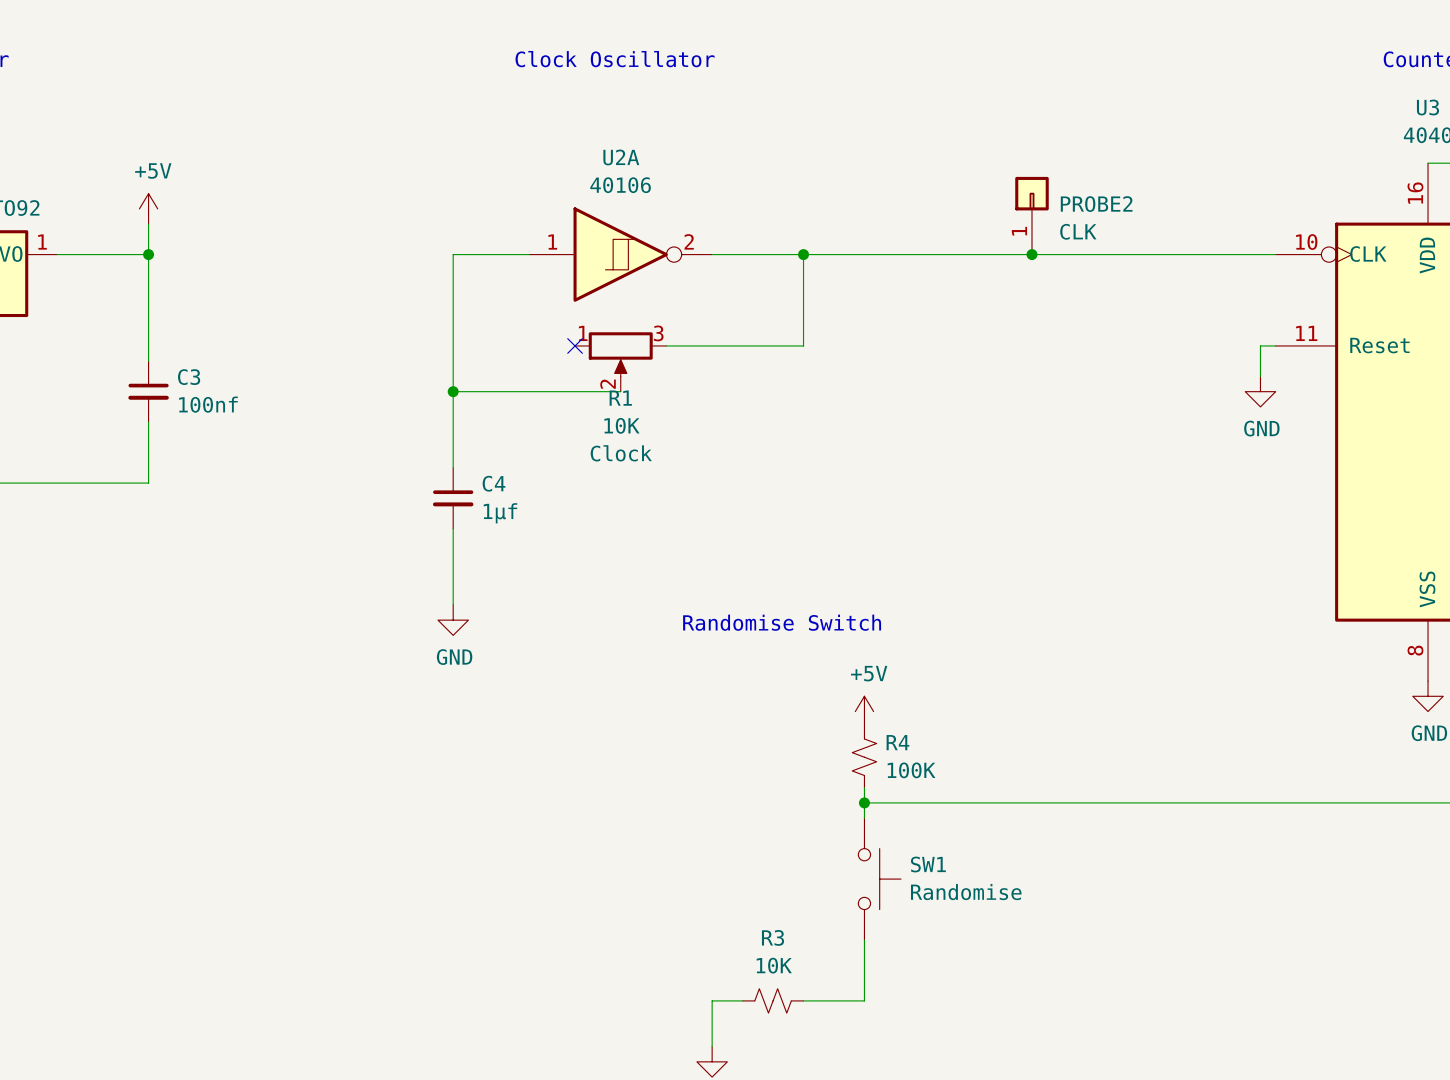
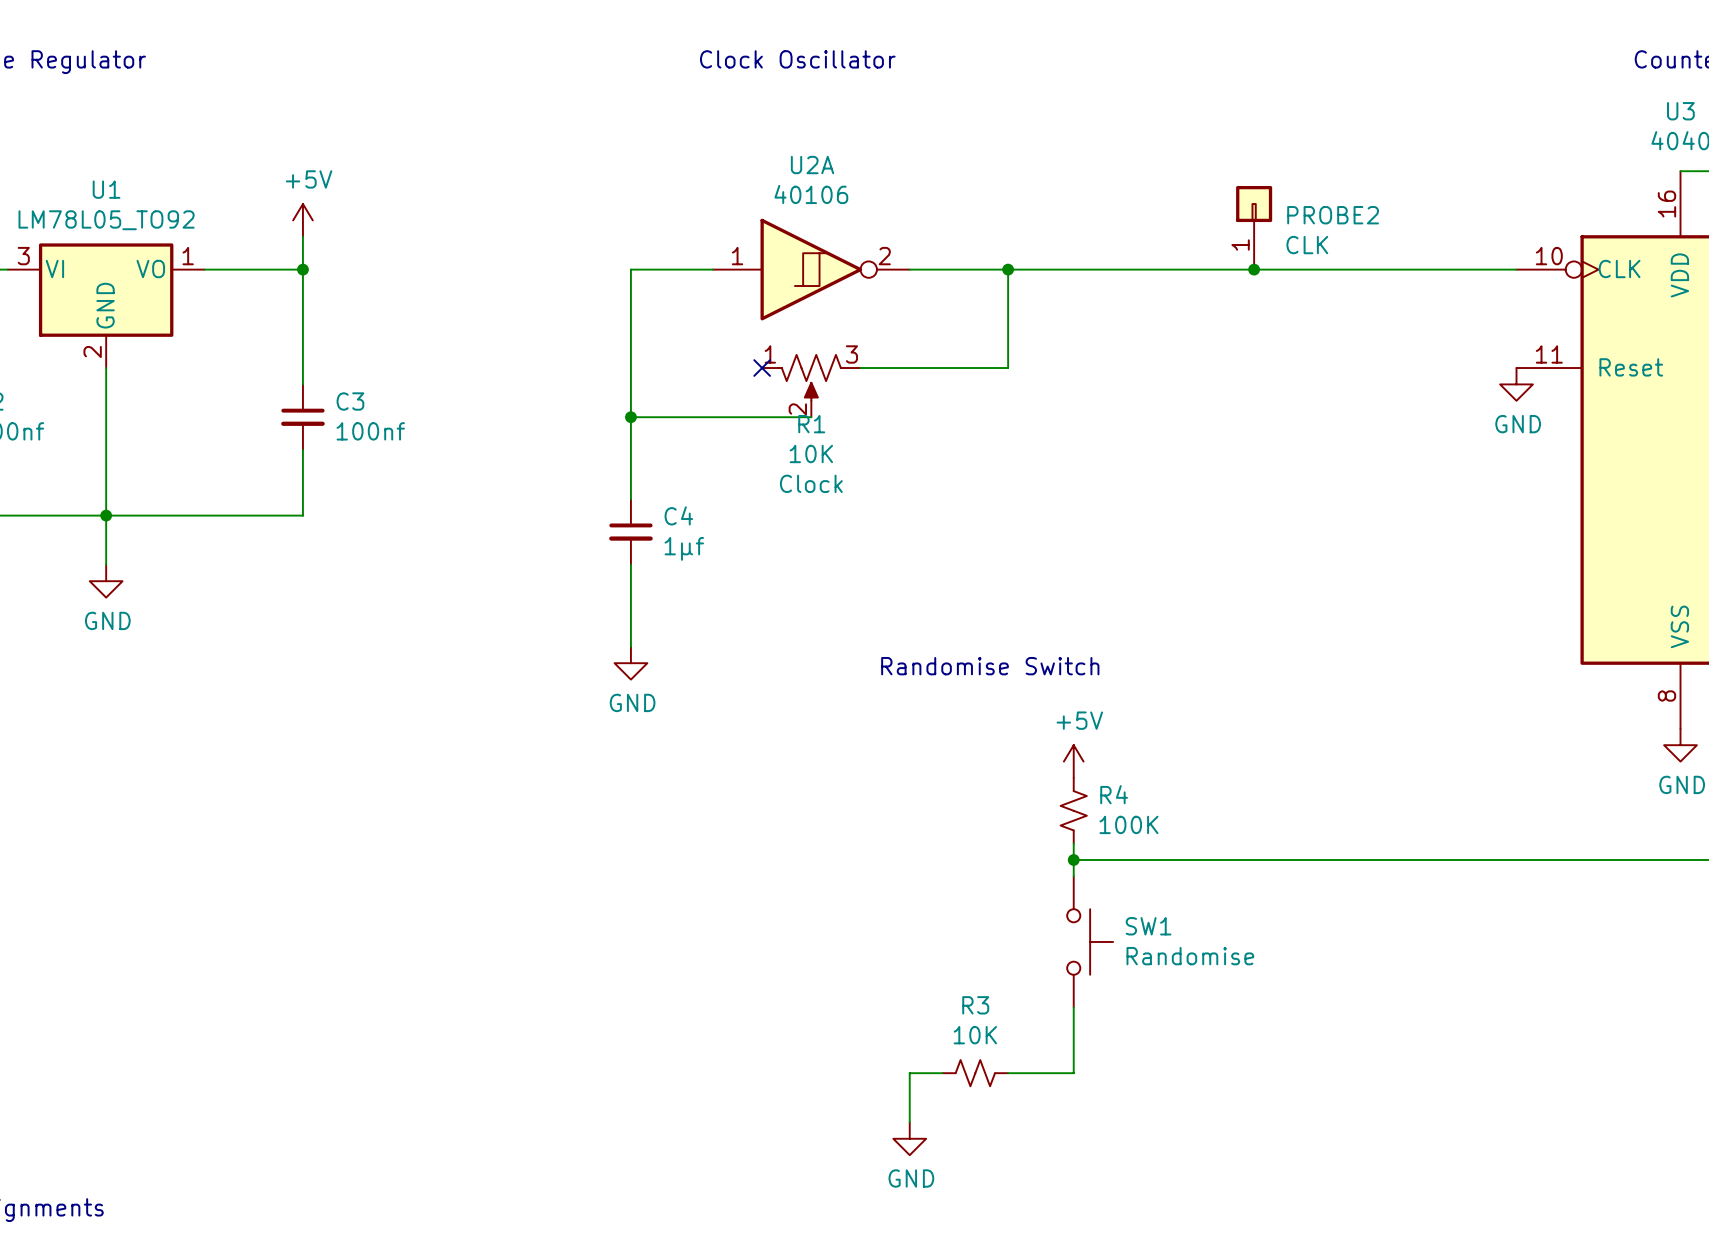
R1 symbol: [575, 332, 667, 392] -> [762, 354, 861, 418]
wire: (1275, 345) (1260, 345) (1260, 376) -> none
power symbol position: GND (1260, 391) -> GND (1516, 384)

